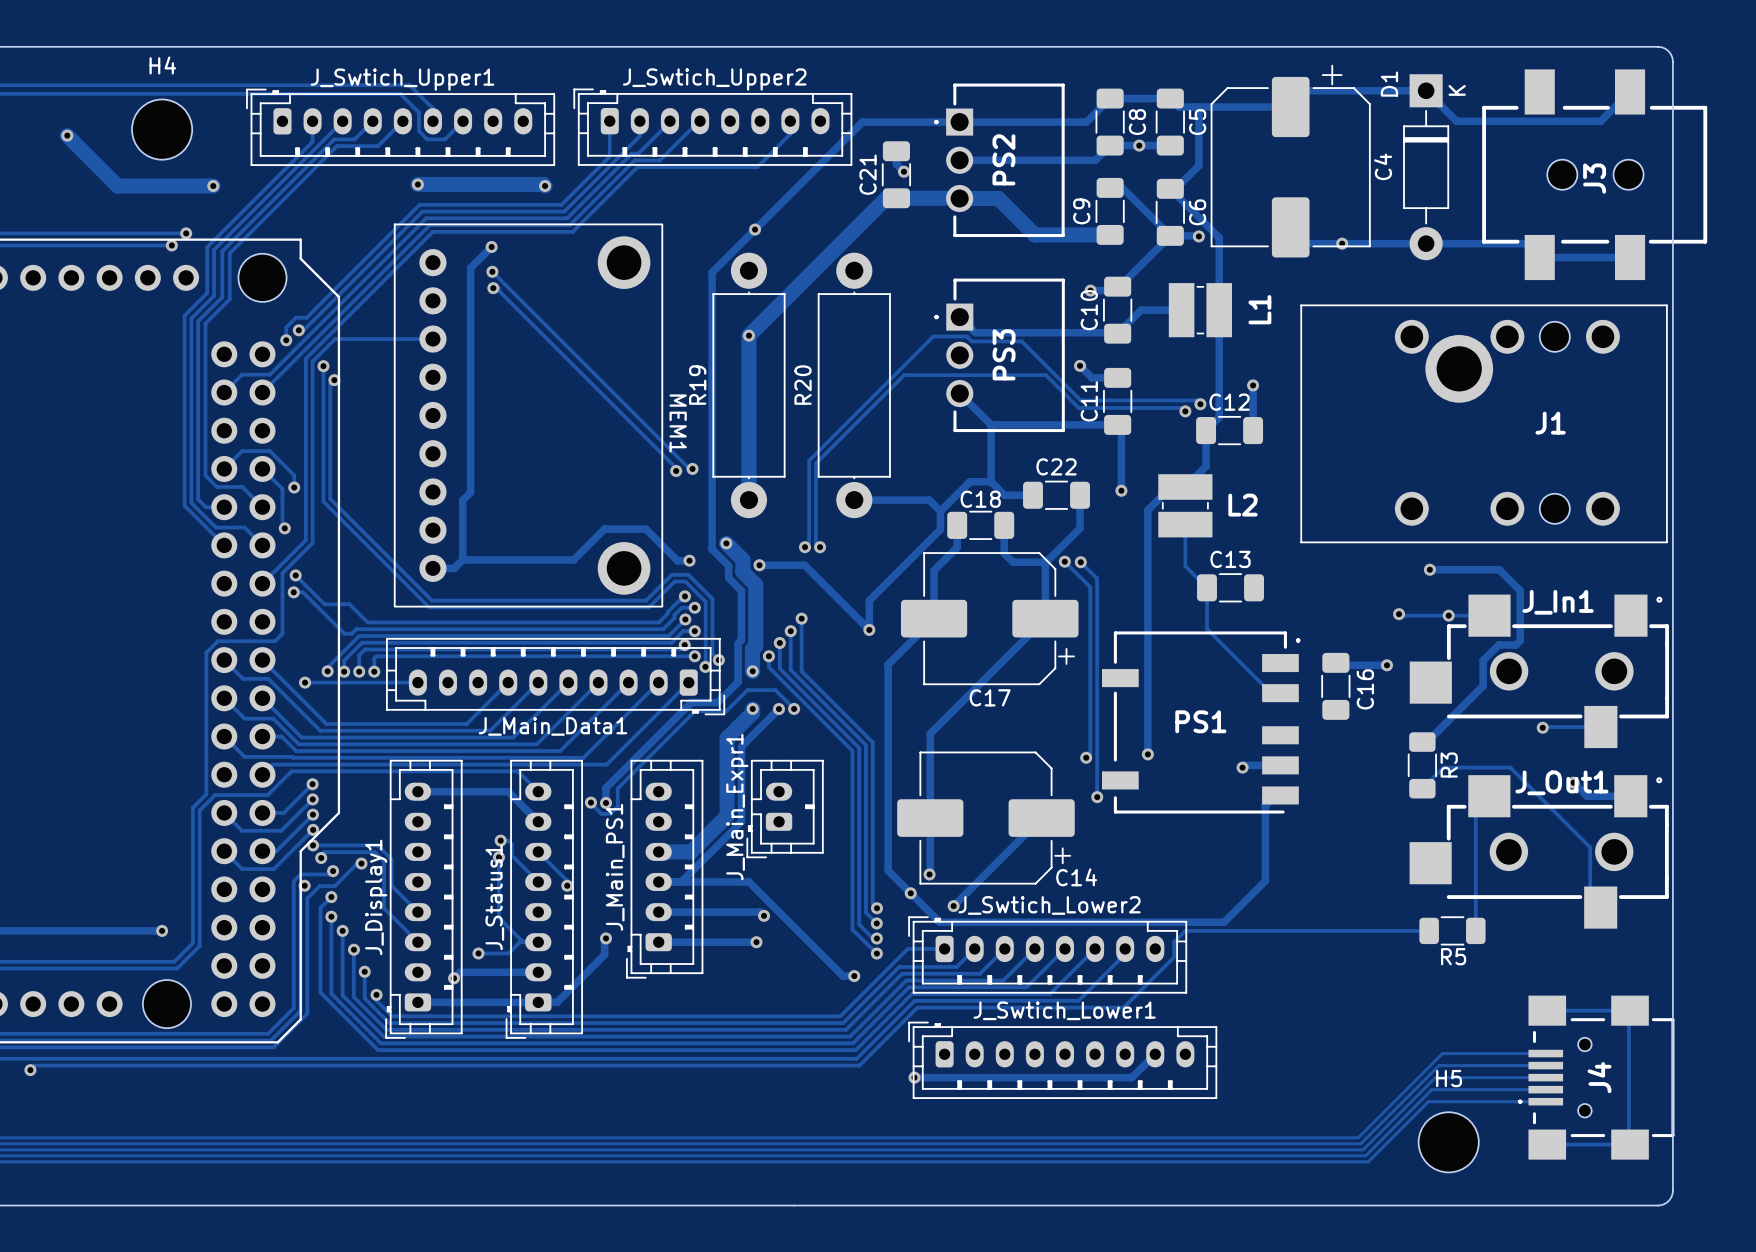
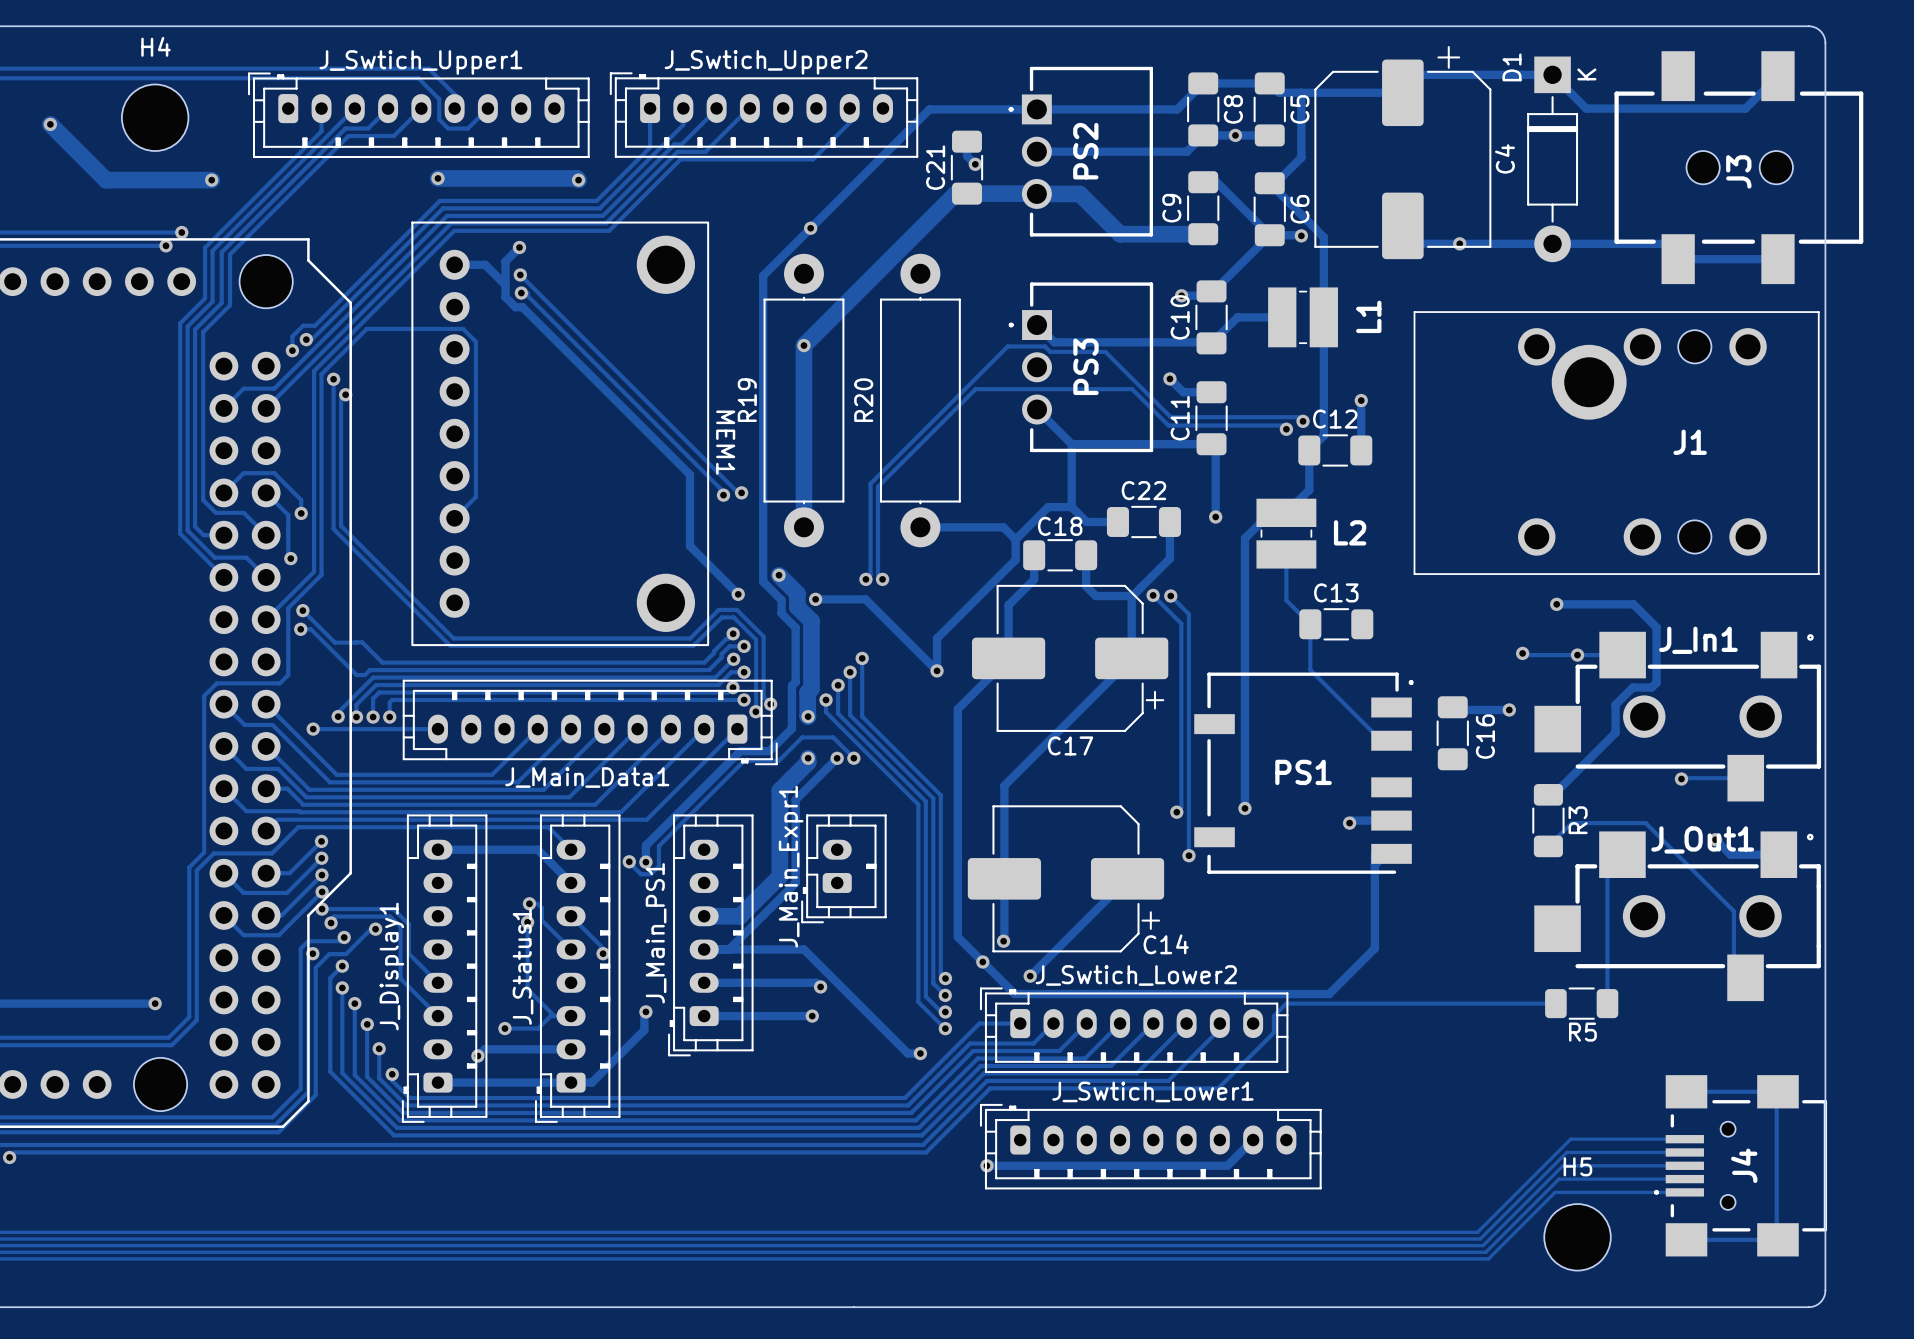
track: (479, 259) (470, 268) (470, 492) (462, 500) (462, 559) -> (505, 261) (505, 297) (515, 307) (522, 307) (690, 474) (690, 546) (738, 594)
track: none -> (454, 264) (485, 264) (505, 285)
track: (335, 339) (432, 339) -> (346, 349) (366, 328) (463, 328) (475, 341) (475, 497) (454, 518)
track: (462, 559) (573, 559) (604, 529) (645, 529) (677, 560) (689, 560) -> none
track: (462, 559) (454, 568) (432, 568) -> none

